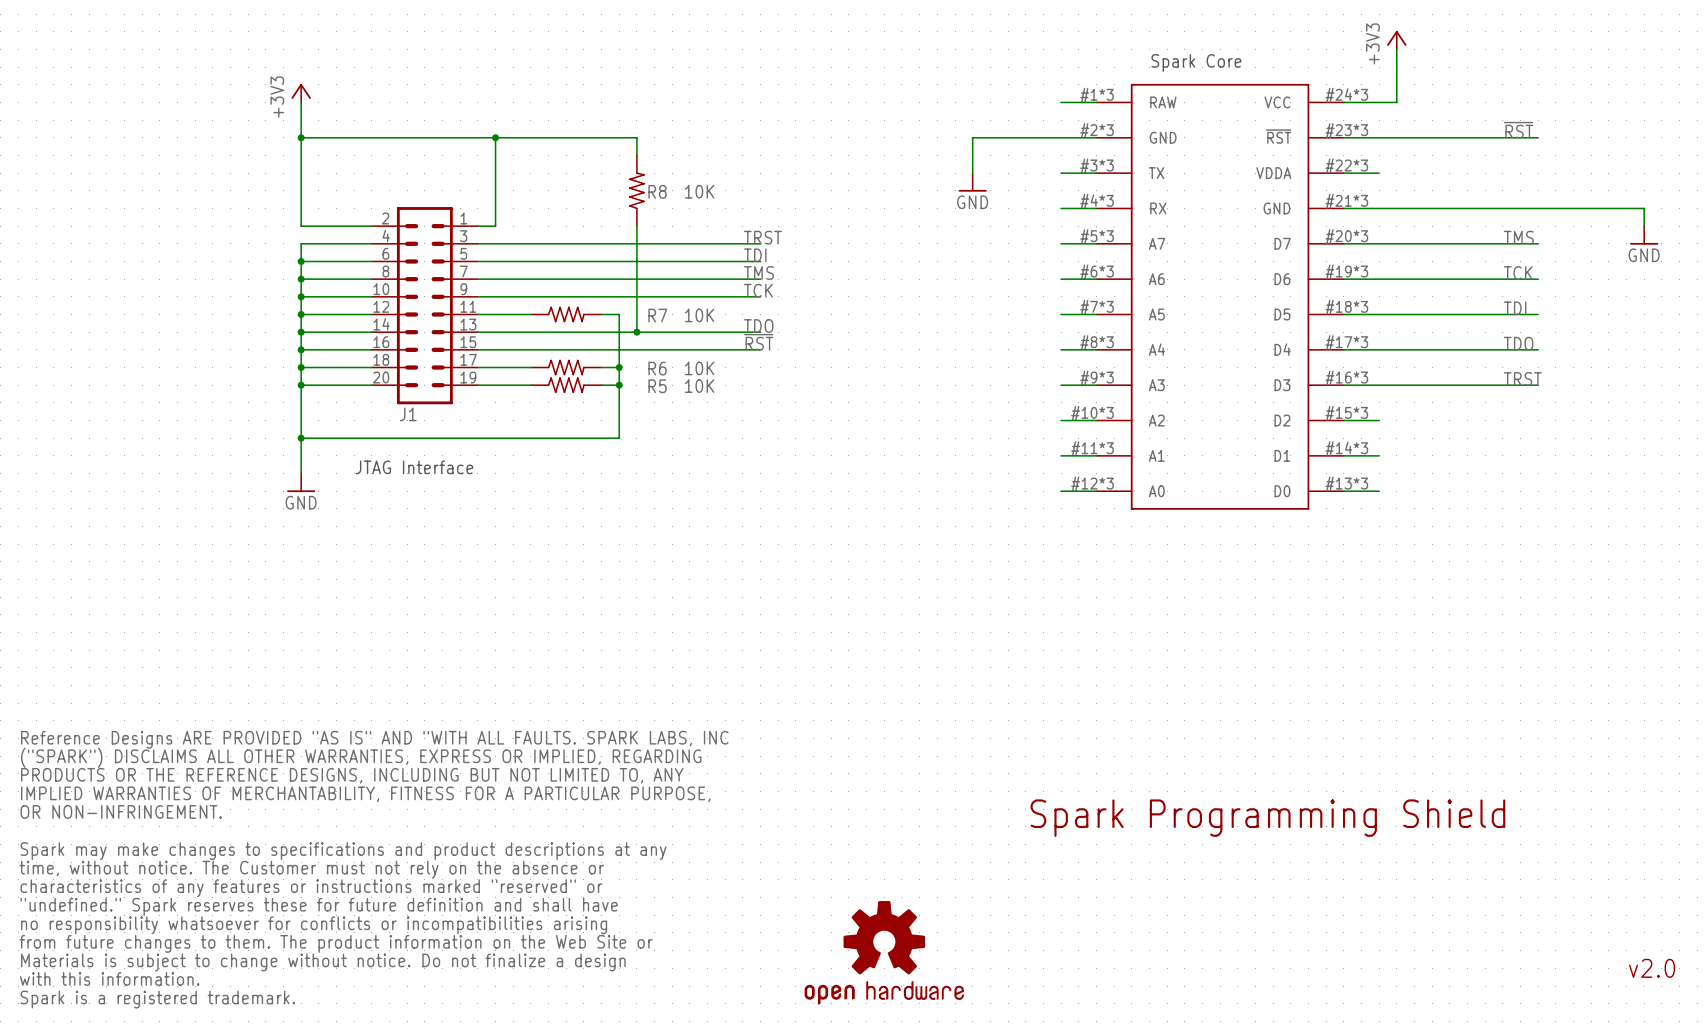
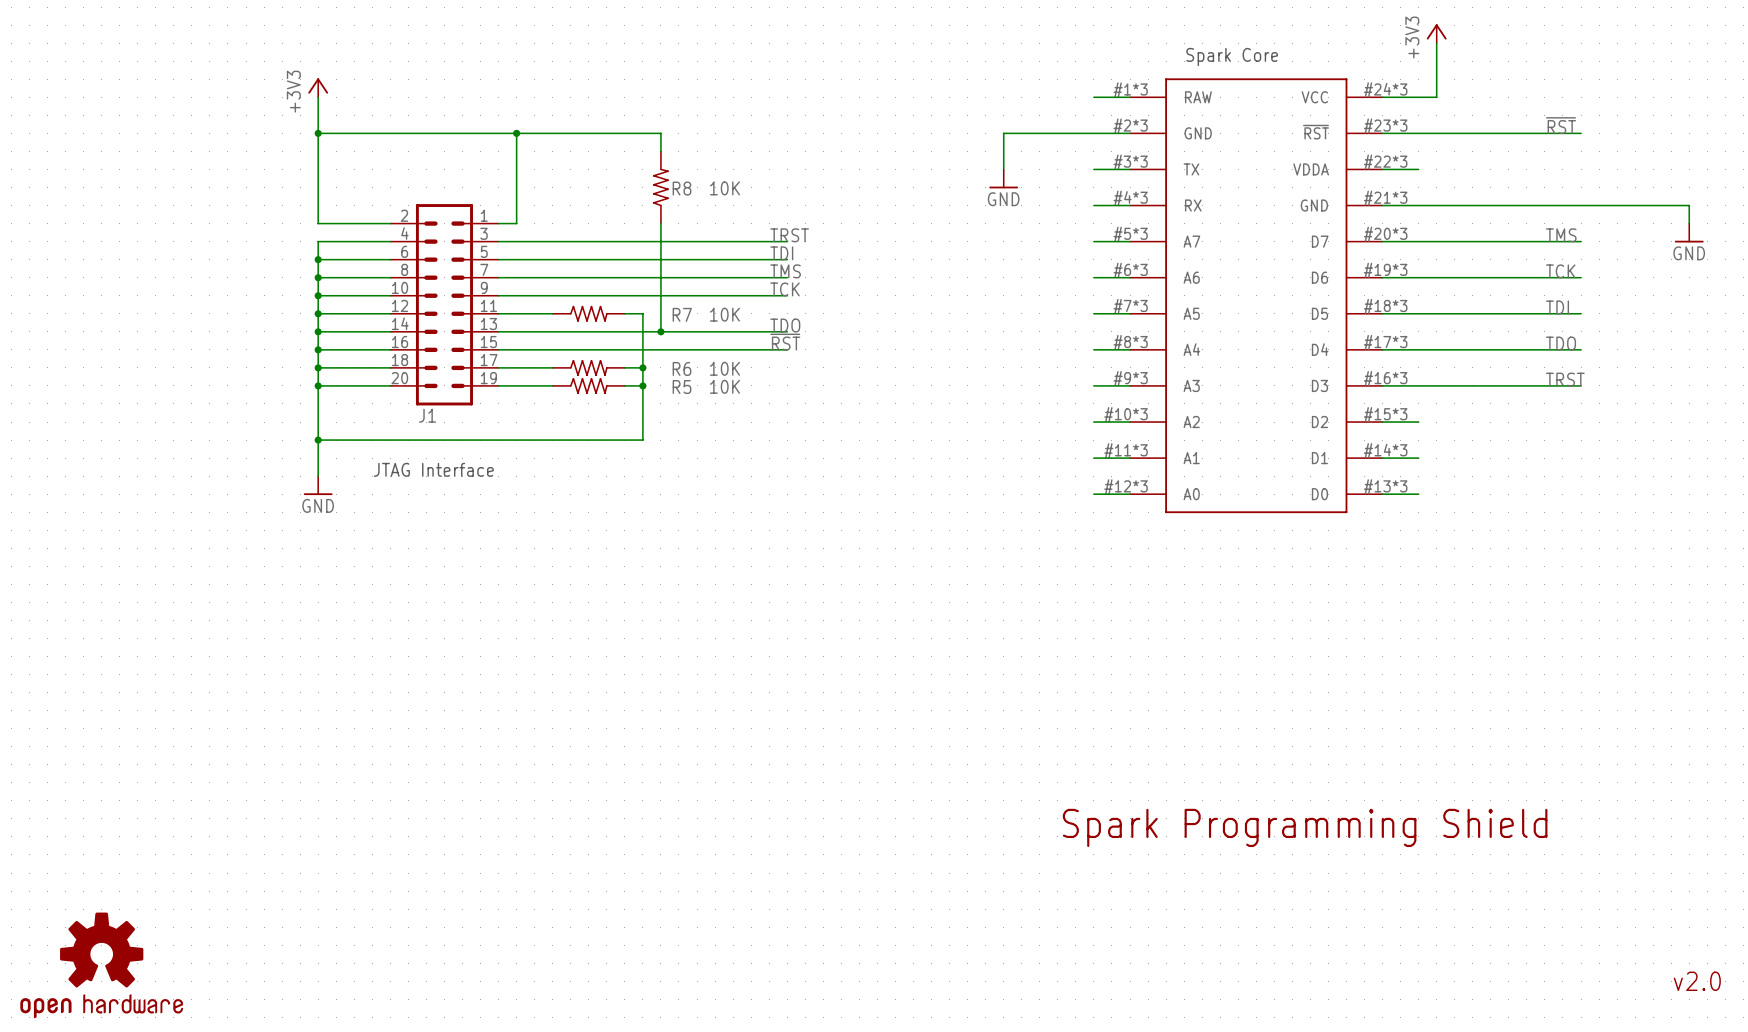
text: Reference Designs ARE PROVIDED "AS IS" AND "WITH ALL FAULTS. SPARK LABS, INC (374, 739) -> none
text: ("SPARK") DISCLAIMS ALL OTHER WARRANTIES, EXPRESS OR IMPLIED, REGARDING (361, 757) -> none
text: PRODUCTS OR THE REFERENCE DESIGNS, INCLUDING BUT NOT LIMITED TO, ANY (352, 775) -> none
text: IMPLIED WARRANTIES OF MERCHANTABILITY, FITNESS FOR A PARTICULAR PURPOSE, (365, 794) -> none
text: OR NON-INFRINGEMENT. (121, 811) -> none
text: Spark may make changes to specifications and product descriptions at any (343, 851) -> none
text: time, without notice. The Customer must not rely on the absence or (311, 869) -> none
text: characteristics of any features or instructions marked "reserved" or (311, 888) -> none
text: "undefined." Spark reserves these for future definition and shall have (319, 906) -> none
text: no responsibility whatsoever for conflicts or incompatibilities arising (314, 925) -> none
text: from future changes to them. The product information on the Web Site or (336, 943) -> none
part: none -> (101, 965)
part: (884, 952) -> none
text: Materials is subject to change without notice. Do not finalize a design (323, 962) -> none
text: with this information. (109, 978) -> none
text: Spark is a registered trademark. (157, 999) -> none

